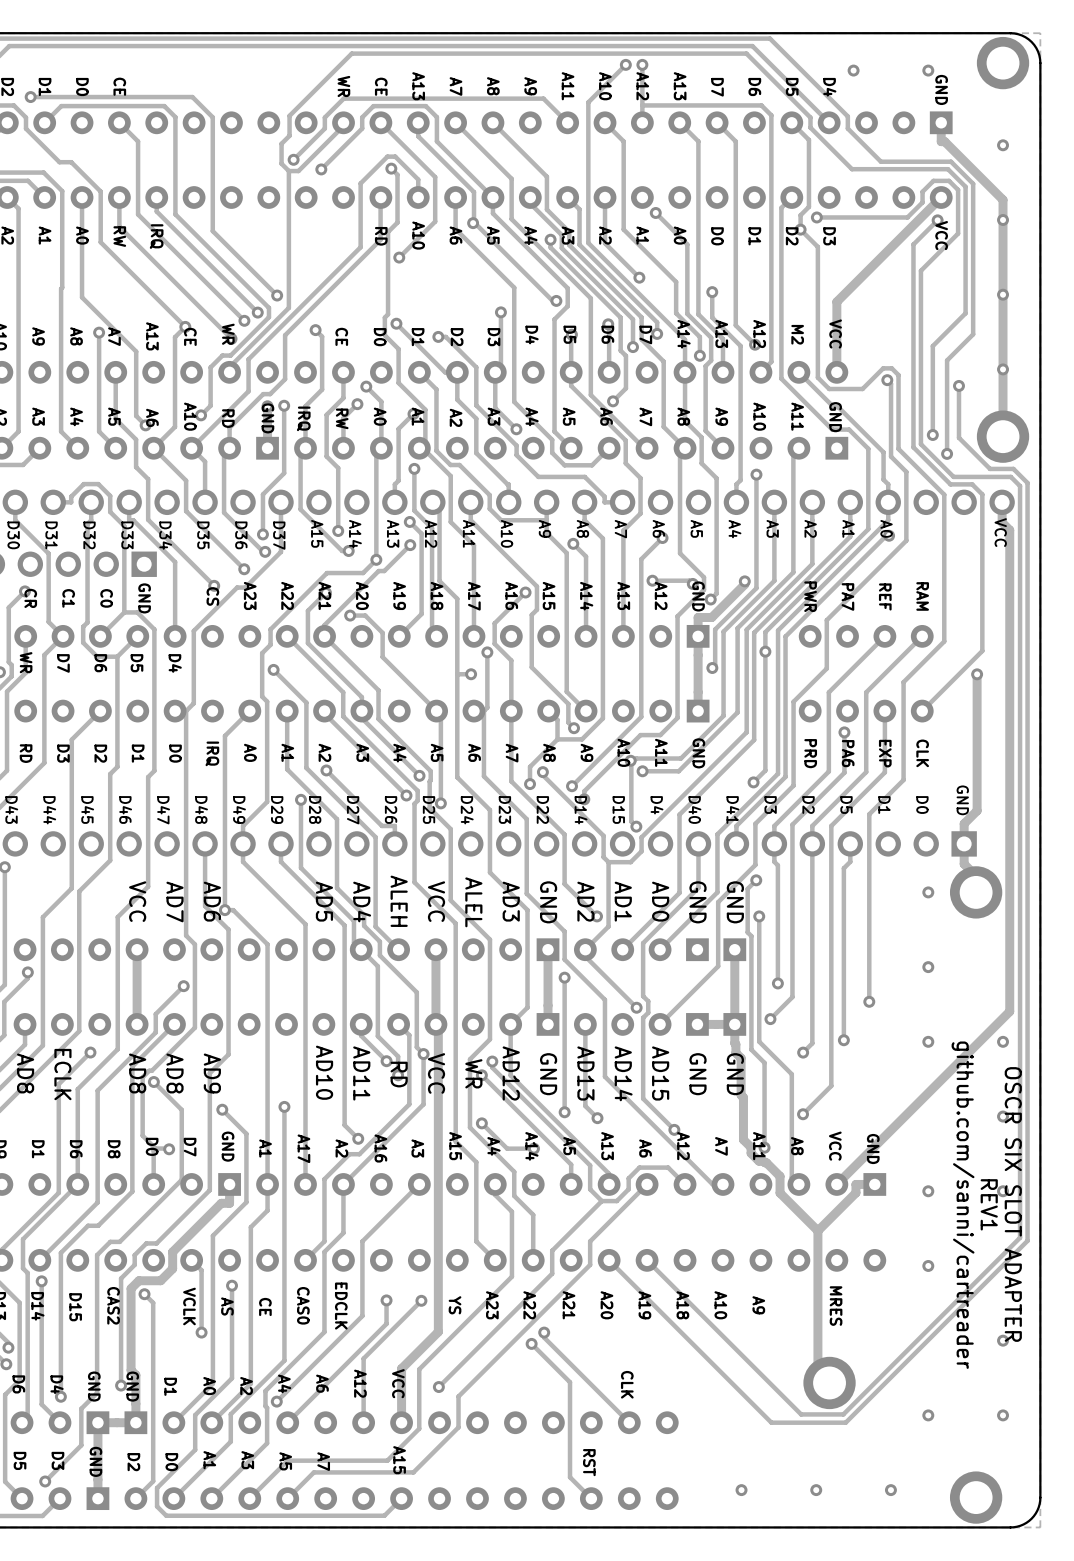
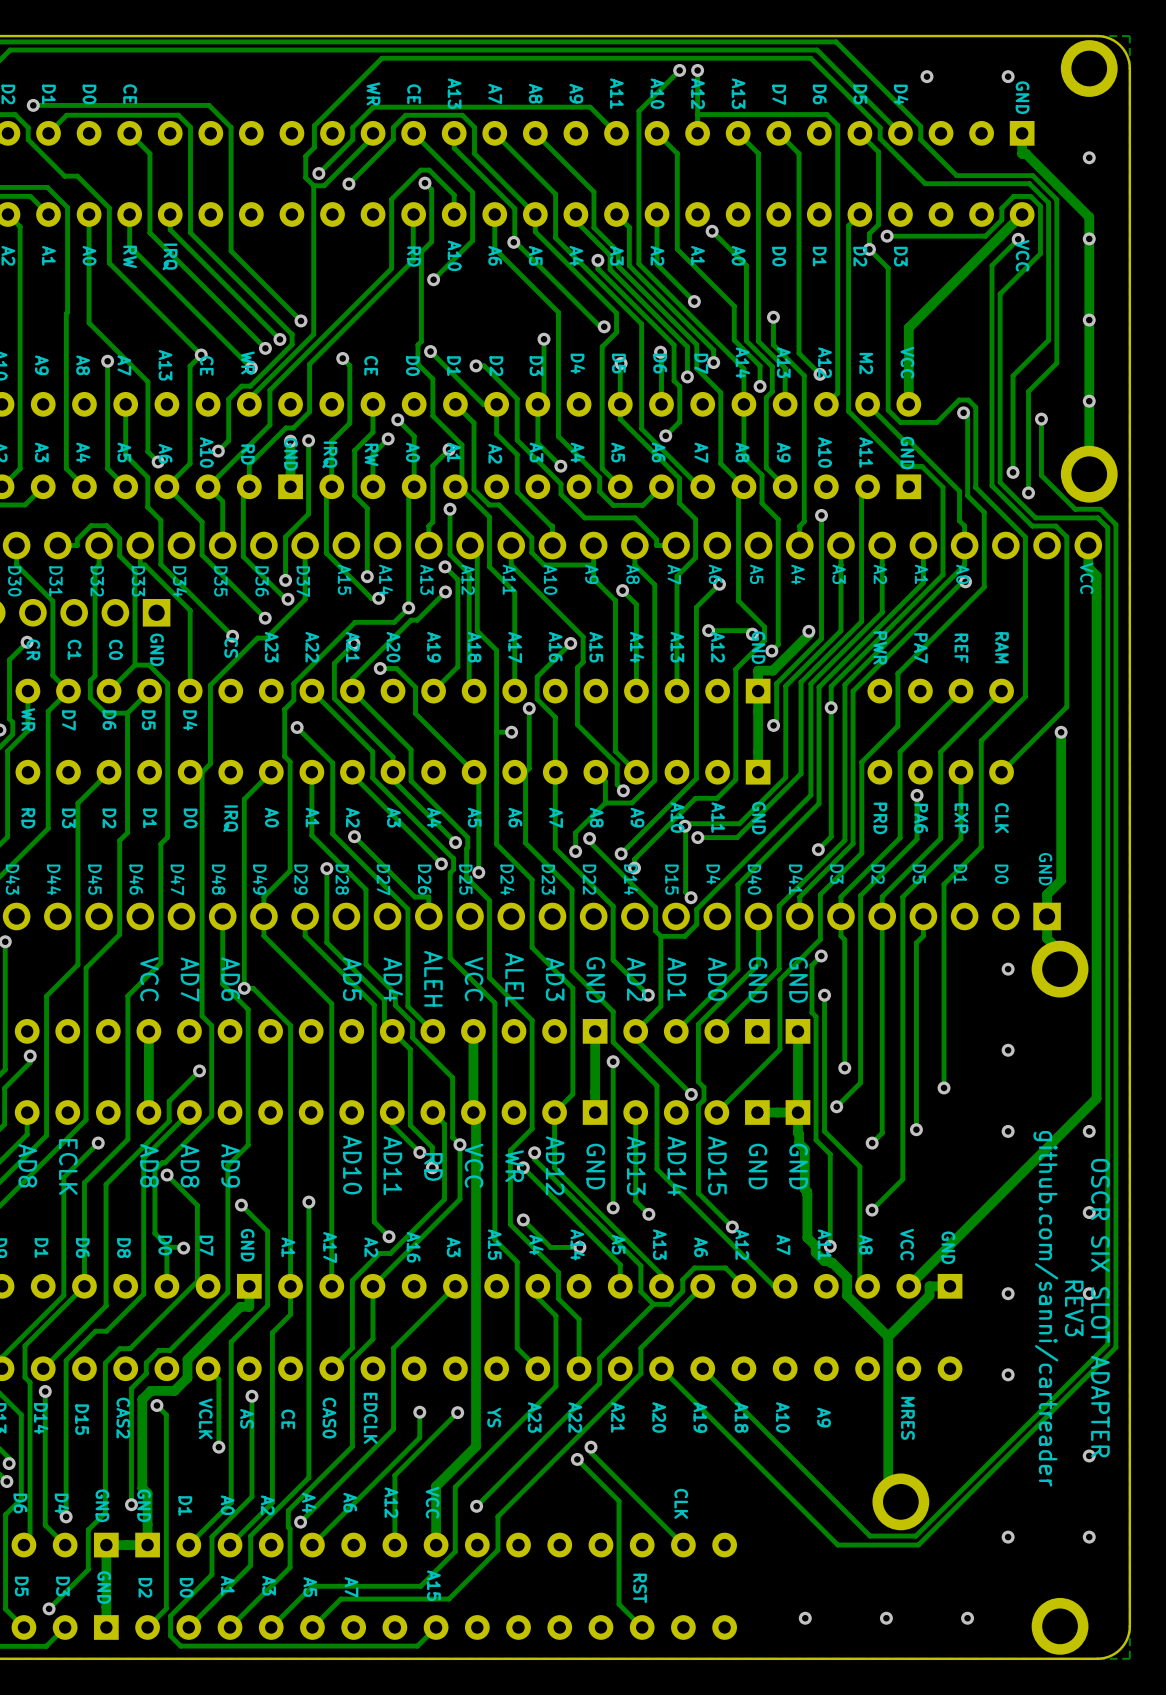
text: REV1 (989, 1204) -> REV3 (1074, 1308)

